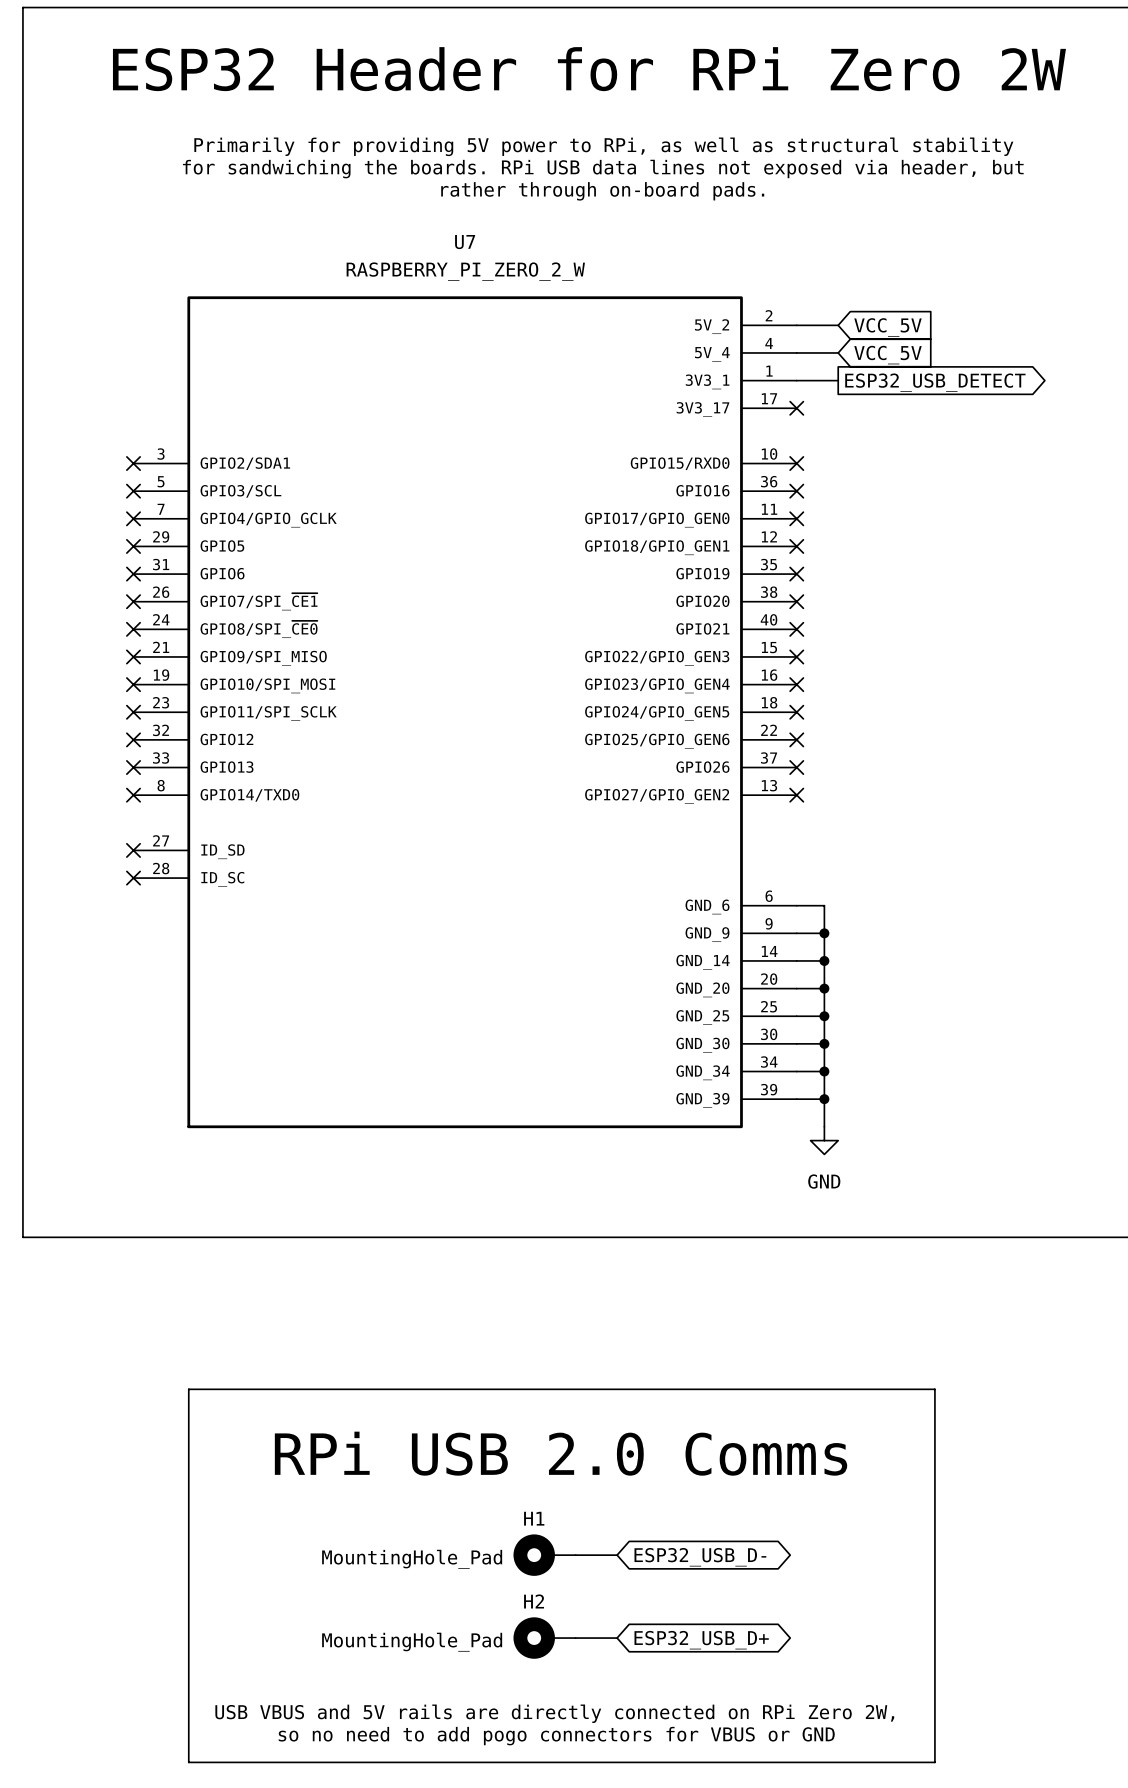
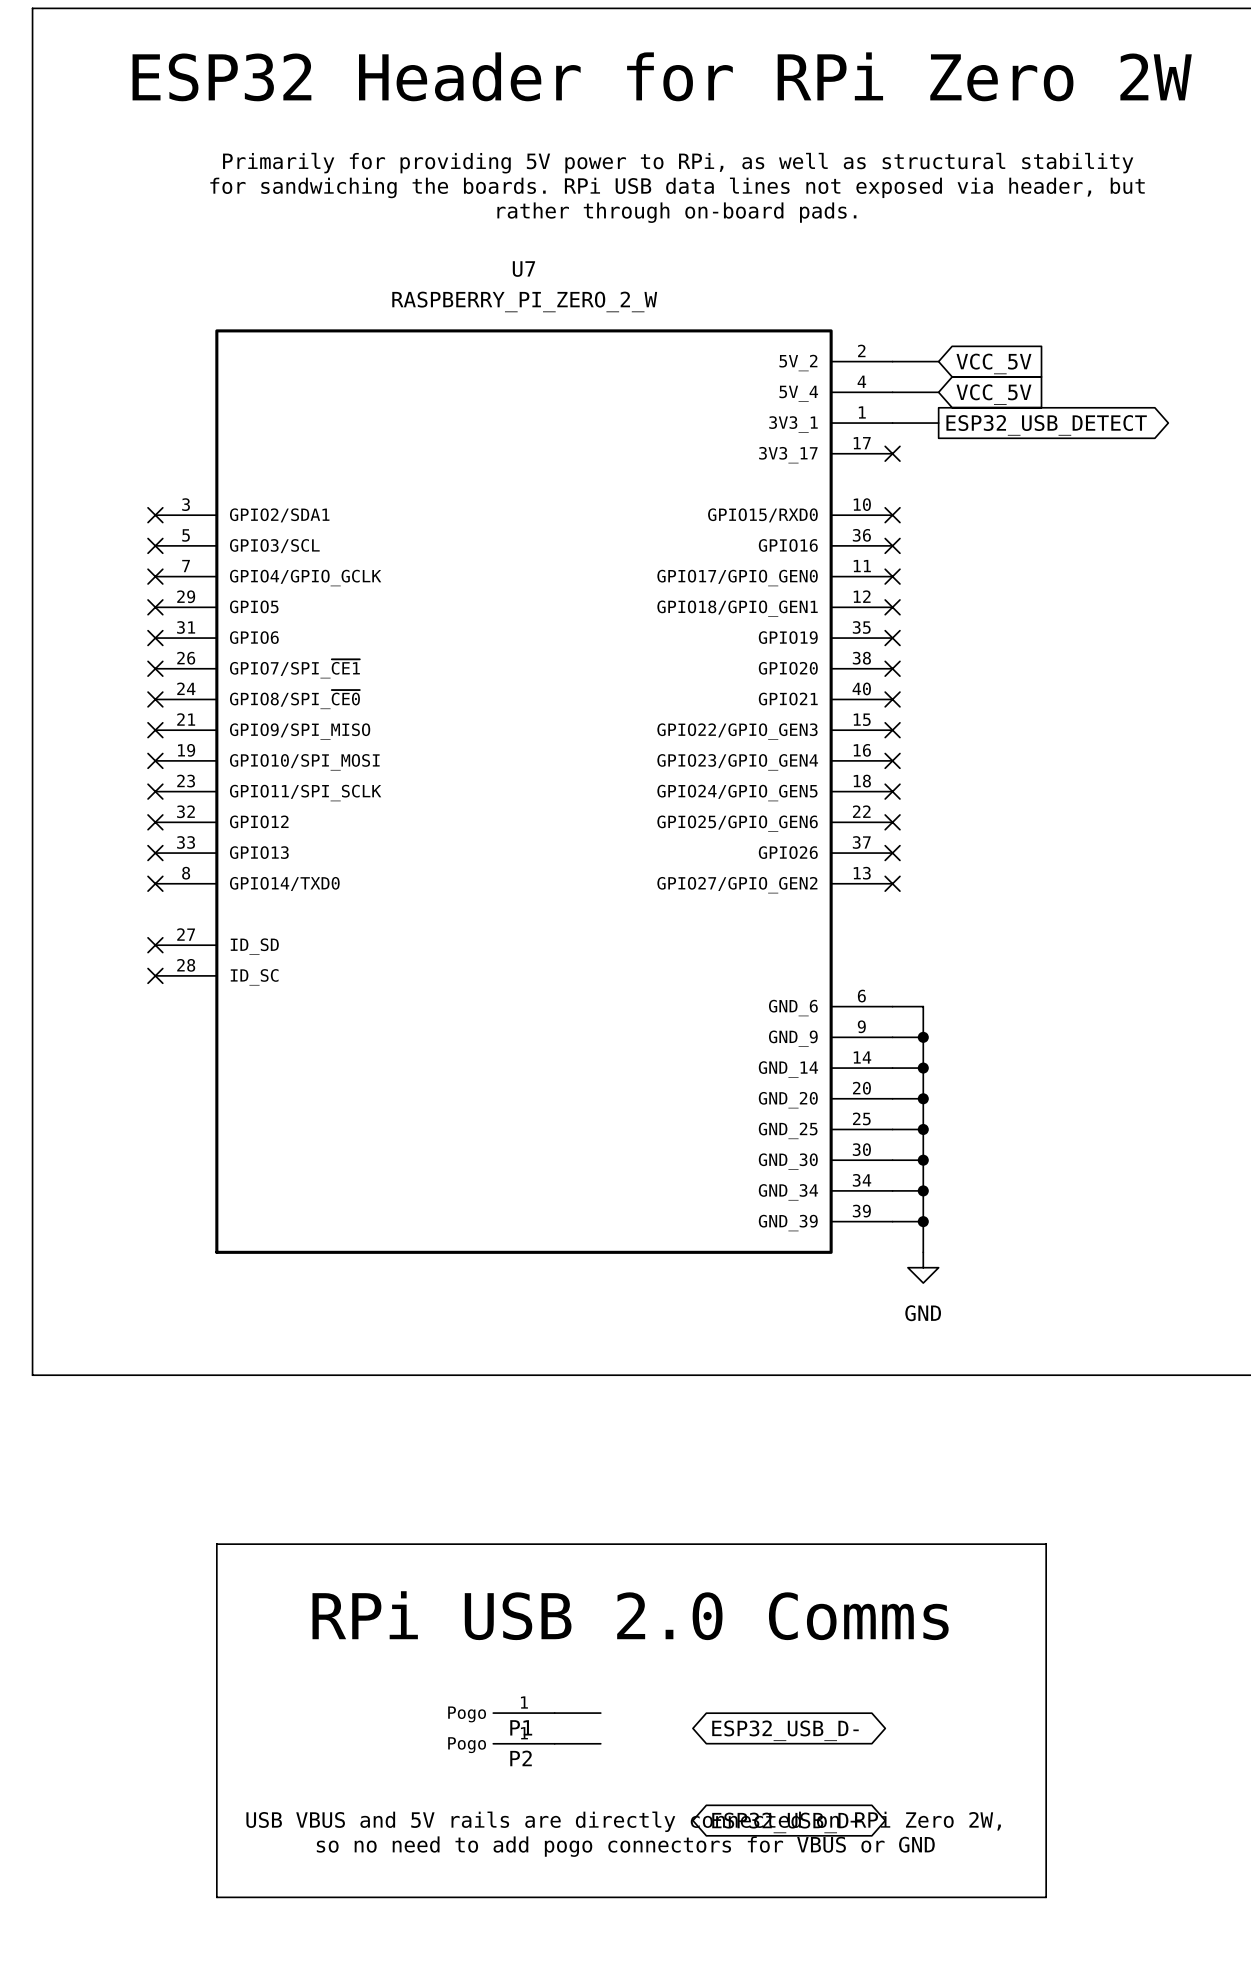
P1: none -> (523, 1713)
H1: MountingHole_Pad (544, 1555) -> none
wire: (575, 1555) (617, 1555) -> (554, 1743) (600, 1743)
P2: none -> (523, 1743)
H2: MountingHole_Pad (544, 1638) -> none
wire: (575, 1638) (617, 1638) -> (554, 1713) (600, 1713)
line: (188, 1707) (188, 1762) (934, 1762) (934, 1707) -> (216, 1897) (1046, 1897)
text position: USB VBUS and 5V rails are directly connected on RPi Zero 2W, (554, 1713) -> USB VBUS and 5V rails are directly connected on RPi Zero 2W, (623, 1821)
text position: so no need to add pogo connectors for VBUS or GND (556, 1736) -> so no need to add pogo connectors for VBUS or GND (625, 1846)

